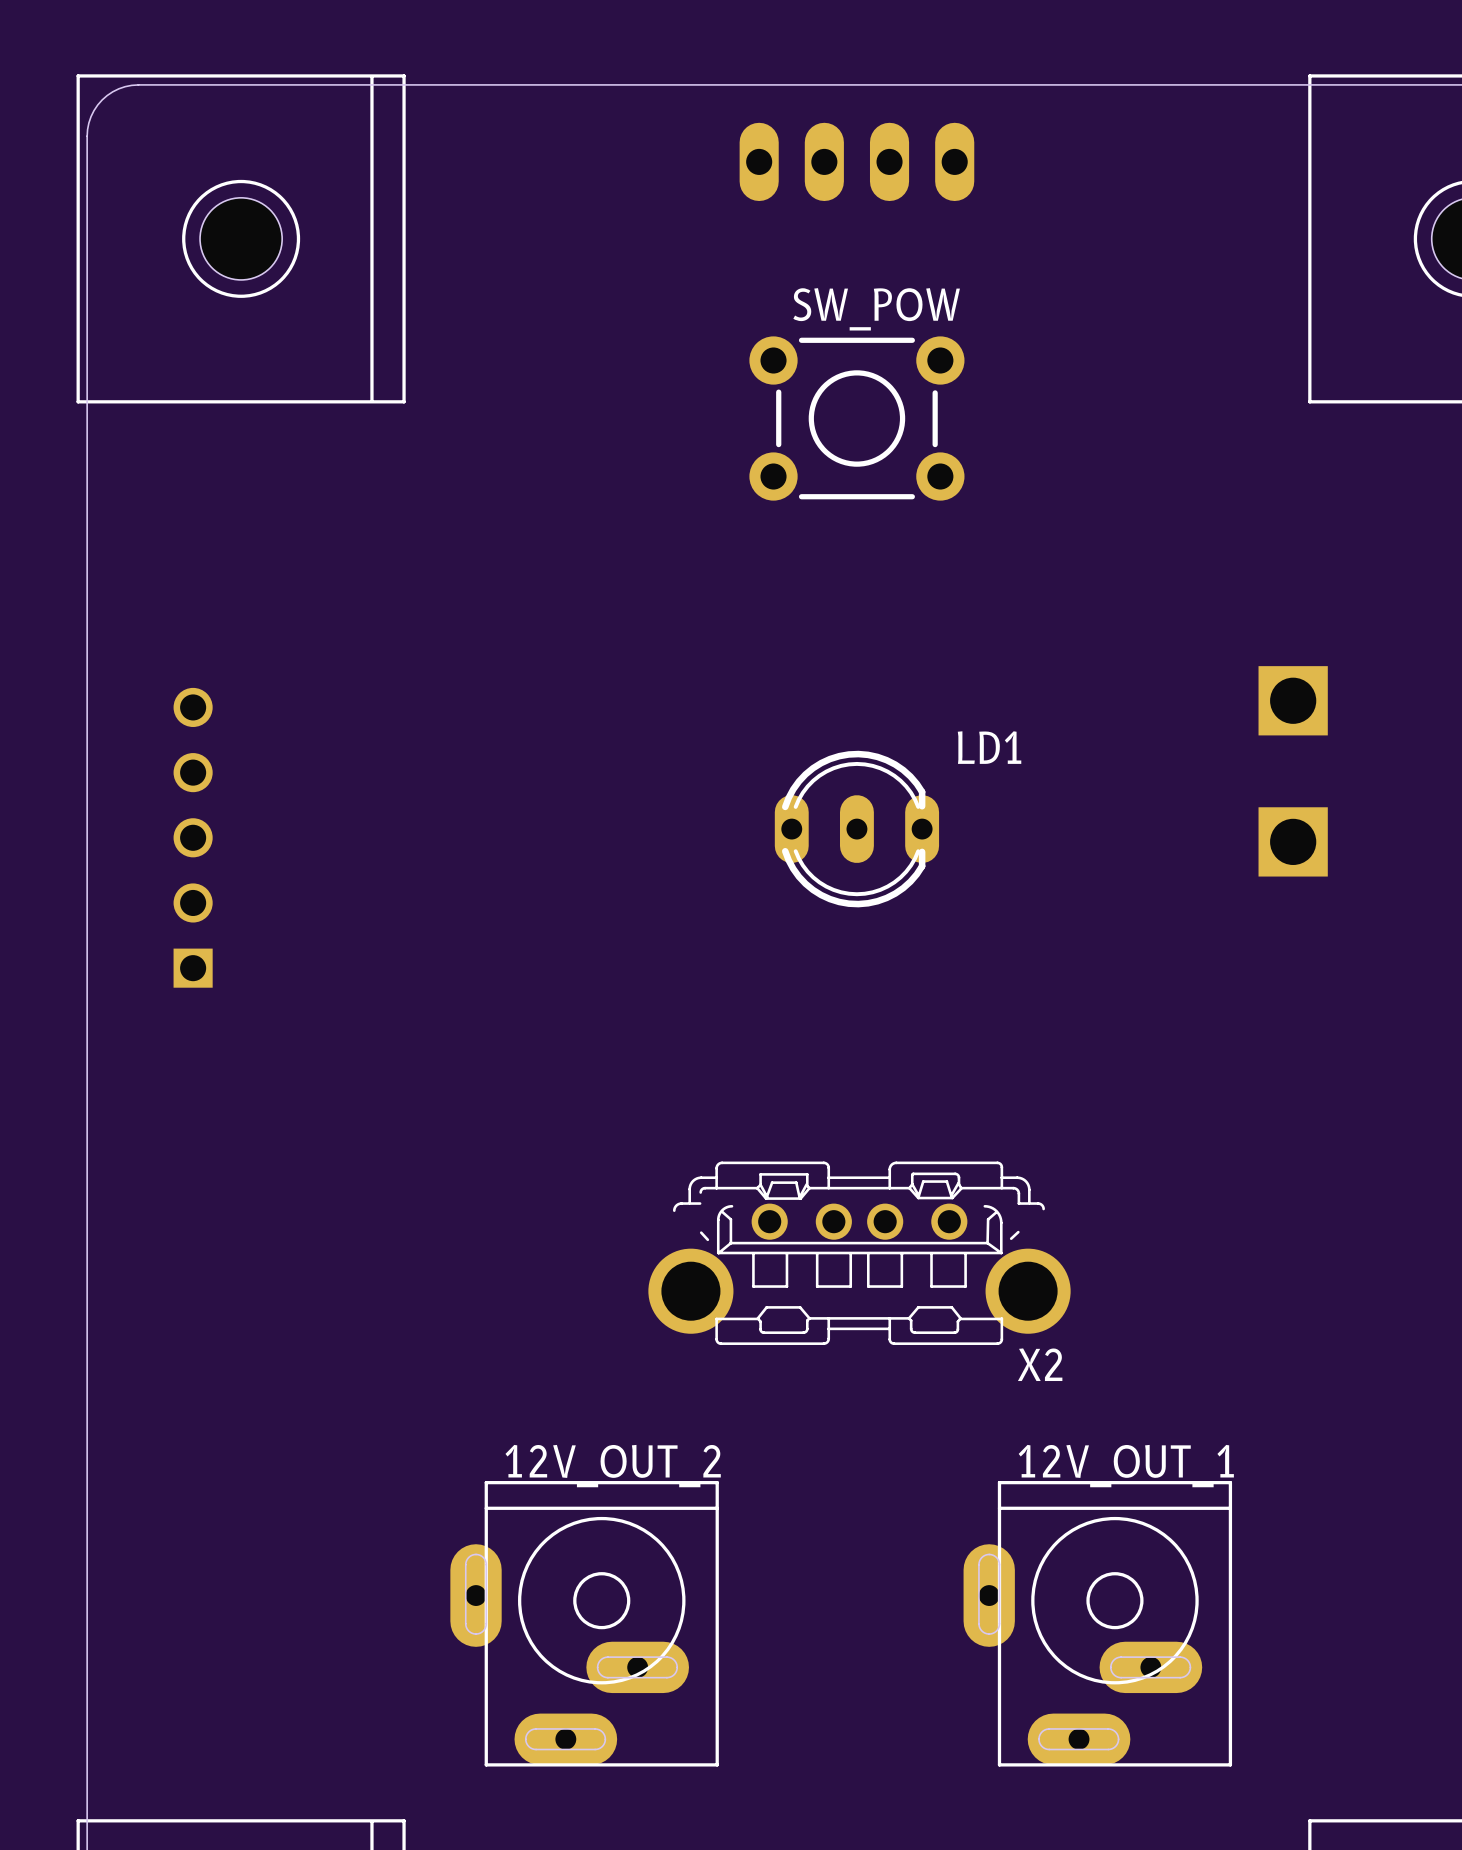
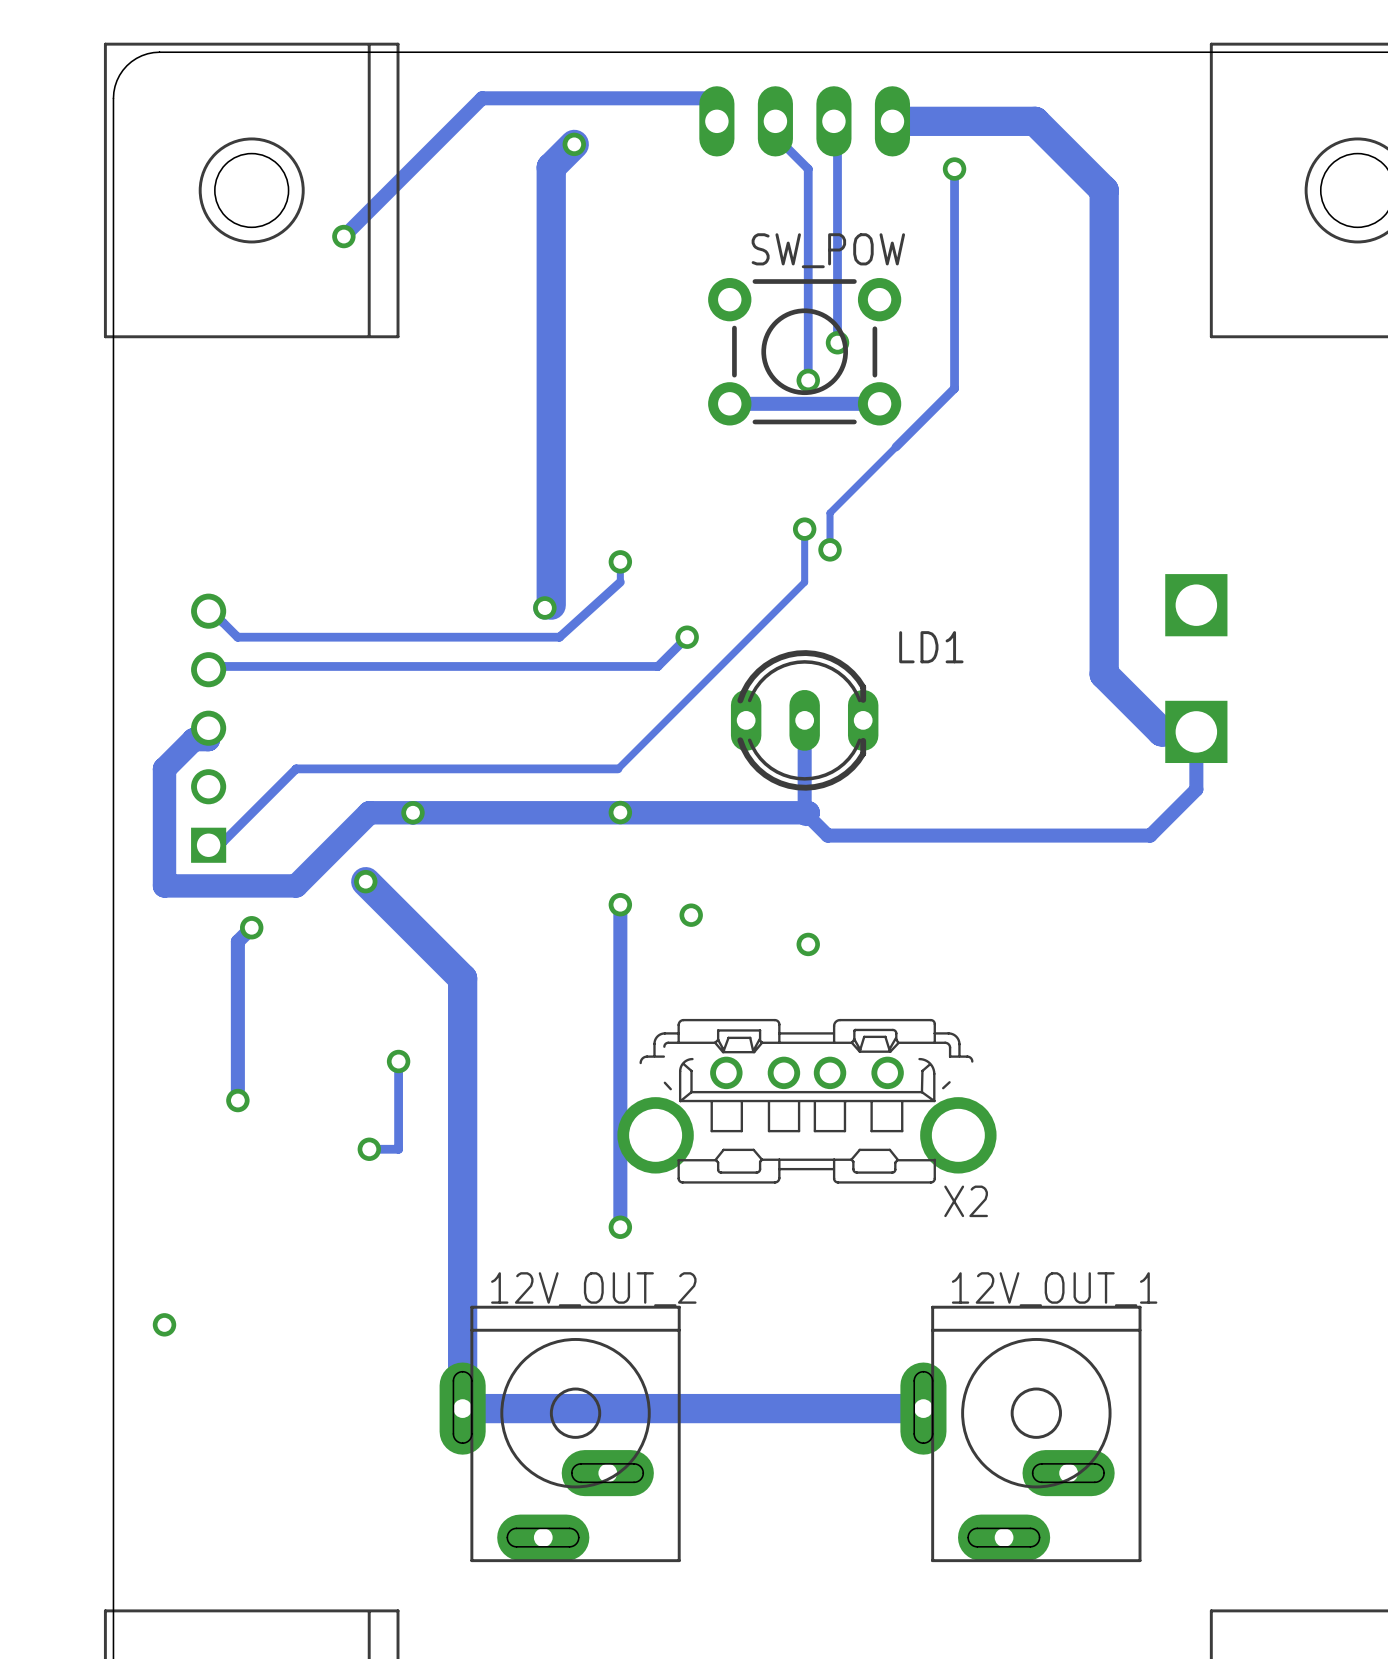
track: none -> (716, 121) (716, 102) (712, 98) (482, 98) (343, 236)
track: none -> (775, 121) (764, 125) (808, 169) (808, 380)
track: none -> (833, 121) (837, 125) (837, 342)
track: none -> (896, 125) (892, 121) (1035, 121) (1104, 190) (1104, 674) (1161, 731) (1196, 731) (1196, 789) (1150, 835) (827, 835) (804, 812)
track: none -> (574, 144) (551, 167) (551, 605) (544, 607)
via: none -> (574, 144)
track: none -> (954, 169) (954, 388) (830, 513) (830, 549)
via: none -> (954, 169)
via: none -> (343, 236)
via: none -> (837, 342)
via: none -> (808, 380)
track: none -> (879, 403) (729, 403)
track: none -> (804, 529) (804, 582) (618, 768) (296, 768) (223, 842) (208, 845)
via: none -> (804, 529)
via: none -> (830, 549)
track: none -> (620, 561) (620, 582) (559, 637) (237, 637) (208, 611)
via: none -> (620, 561)
via: none -> (544, 607)
track: none -> (687, 637) (657, 666) (223, 666) (208, 669)
via: none -> (687, 637)
track: none -> (804, 720) (804, 812)
track: none -> (208, 728) (208, 739) (193, 739) (164, 768) (164, 885) (296, 885) (369, 812) (808, 812) (806, 814)
via: none -> (412, 812)
via: none -> (620, 812)
track: none -> (365, 881) (462, 978) (462, 1408) (923, 1408)
via: none -> (365, 881)
track: none -> (620, 904) (620, 1227)
via: none -> (620, 904)
via: none -> (691, 915)
track: none -> (251, 927) (237, 941) (237, 1100)
via: none -> (251, 927)
via: none -> (808, 944)
track: none -> (398, 1061) (398, 1149) (369, 1149)
via: none -> (398, 1061)
via: none -> (237, 1100)
via: none -> (369, 1149)
via: none -> (620, 1227)
via: none -> (164, 1324)

